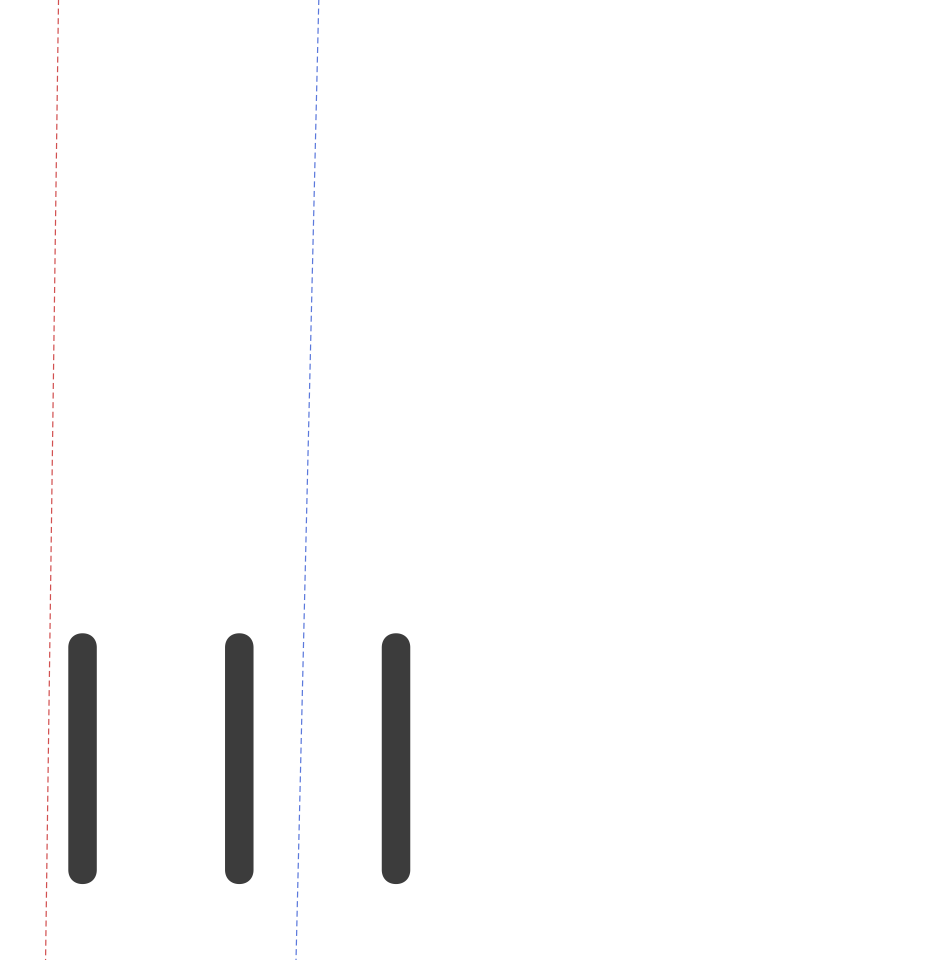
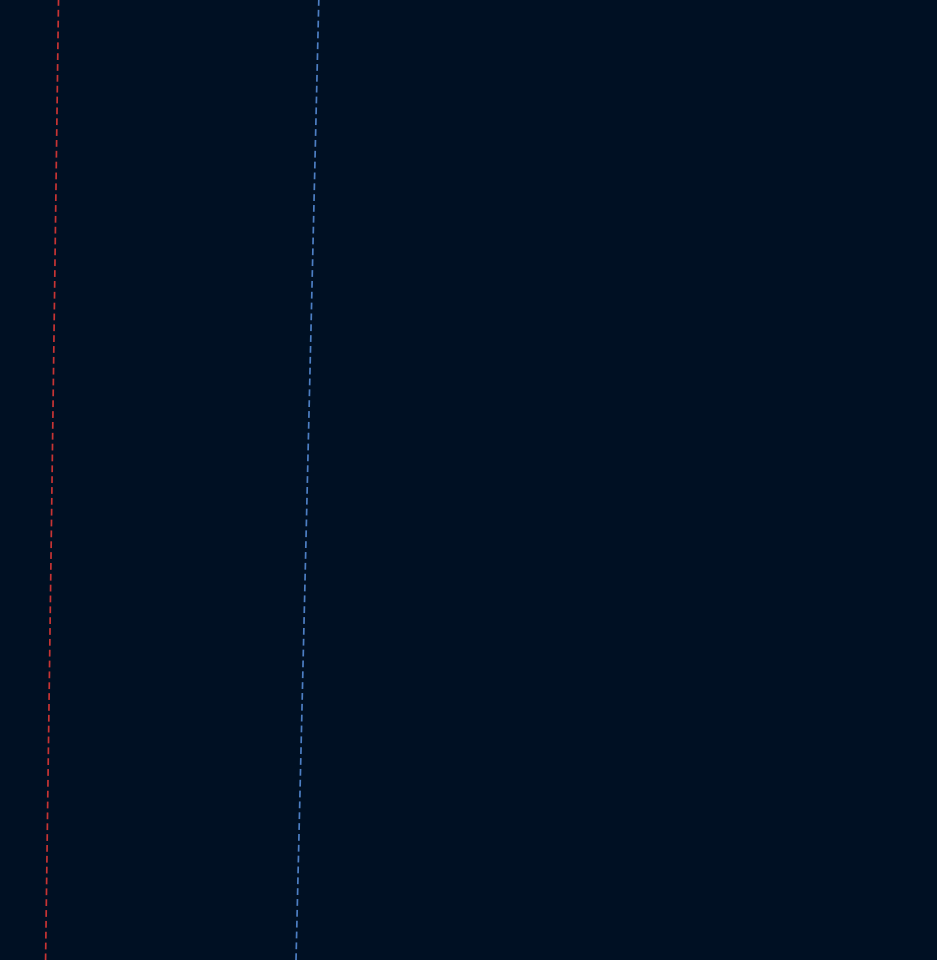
drawing: [68, 633, 411, 885] -> none

